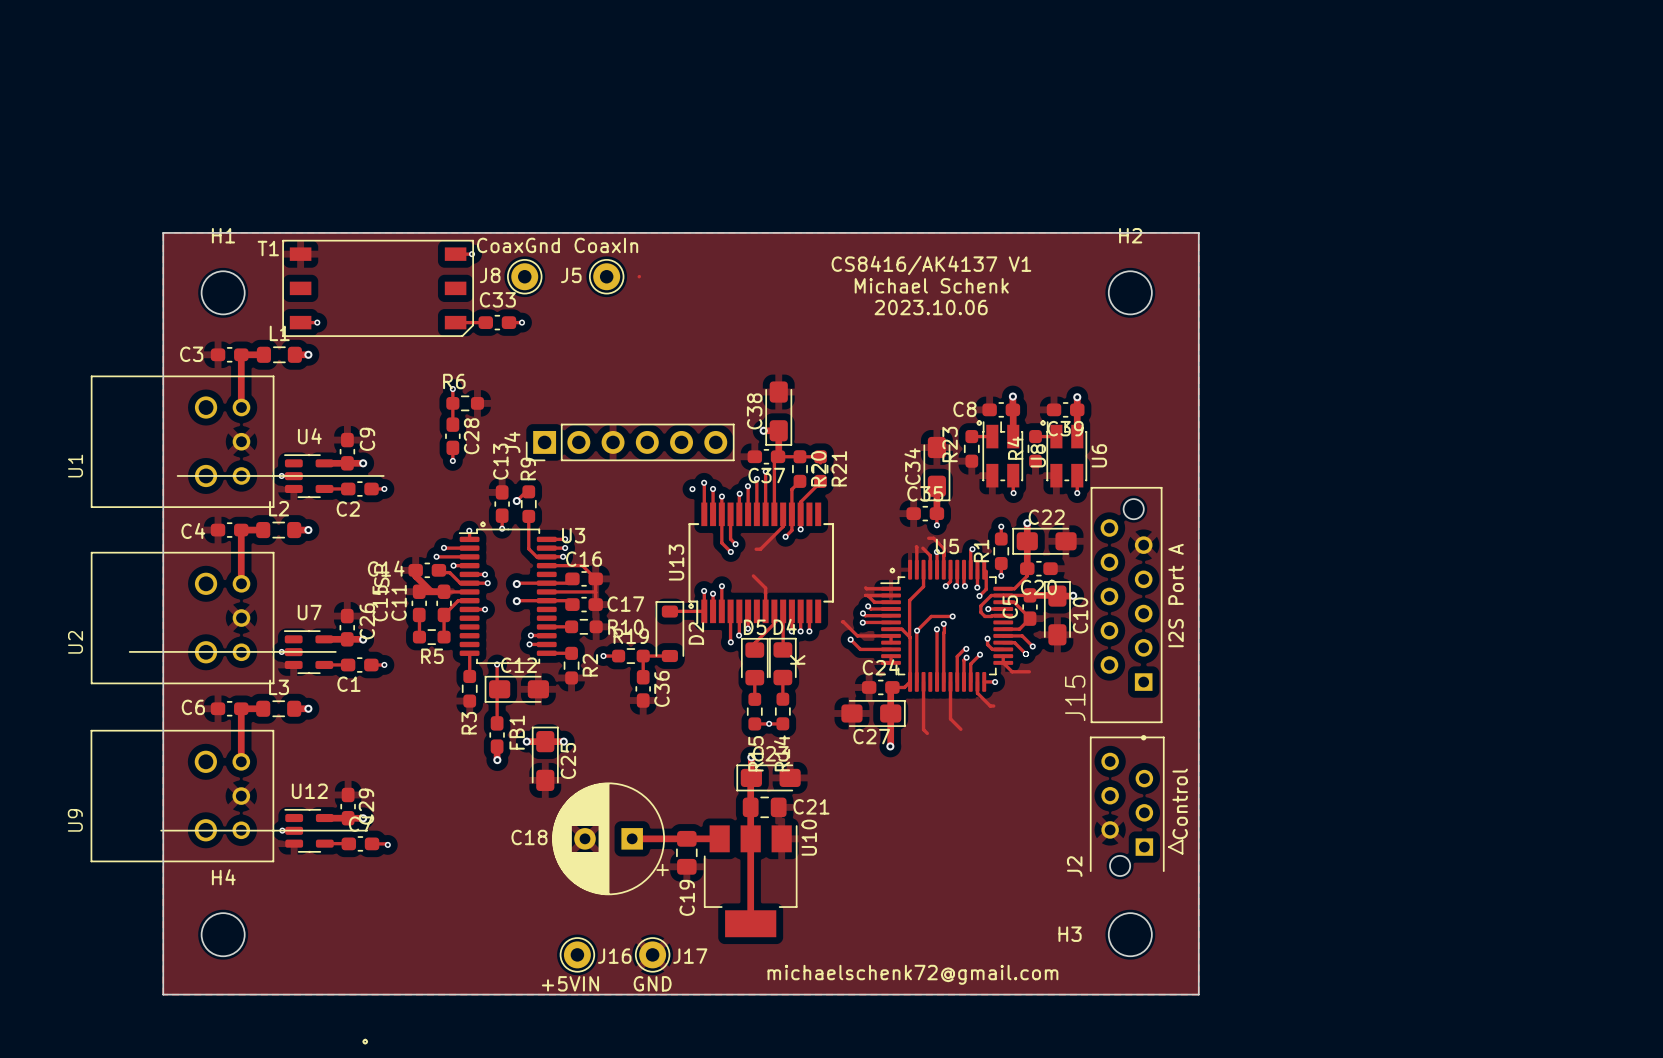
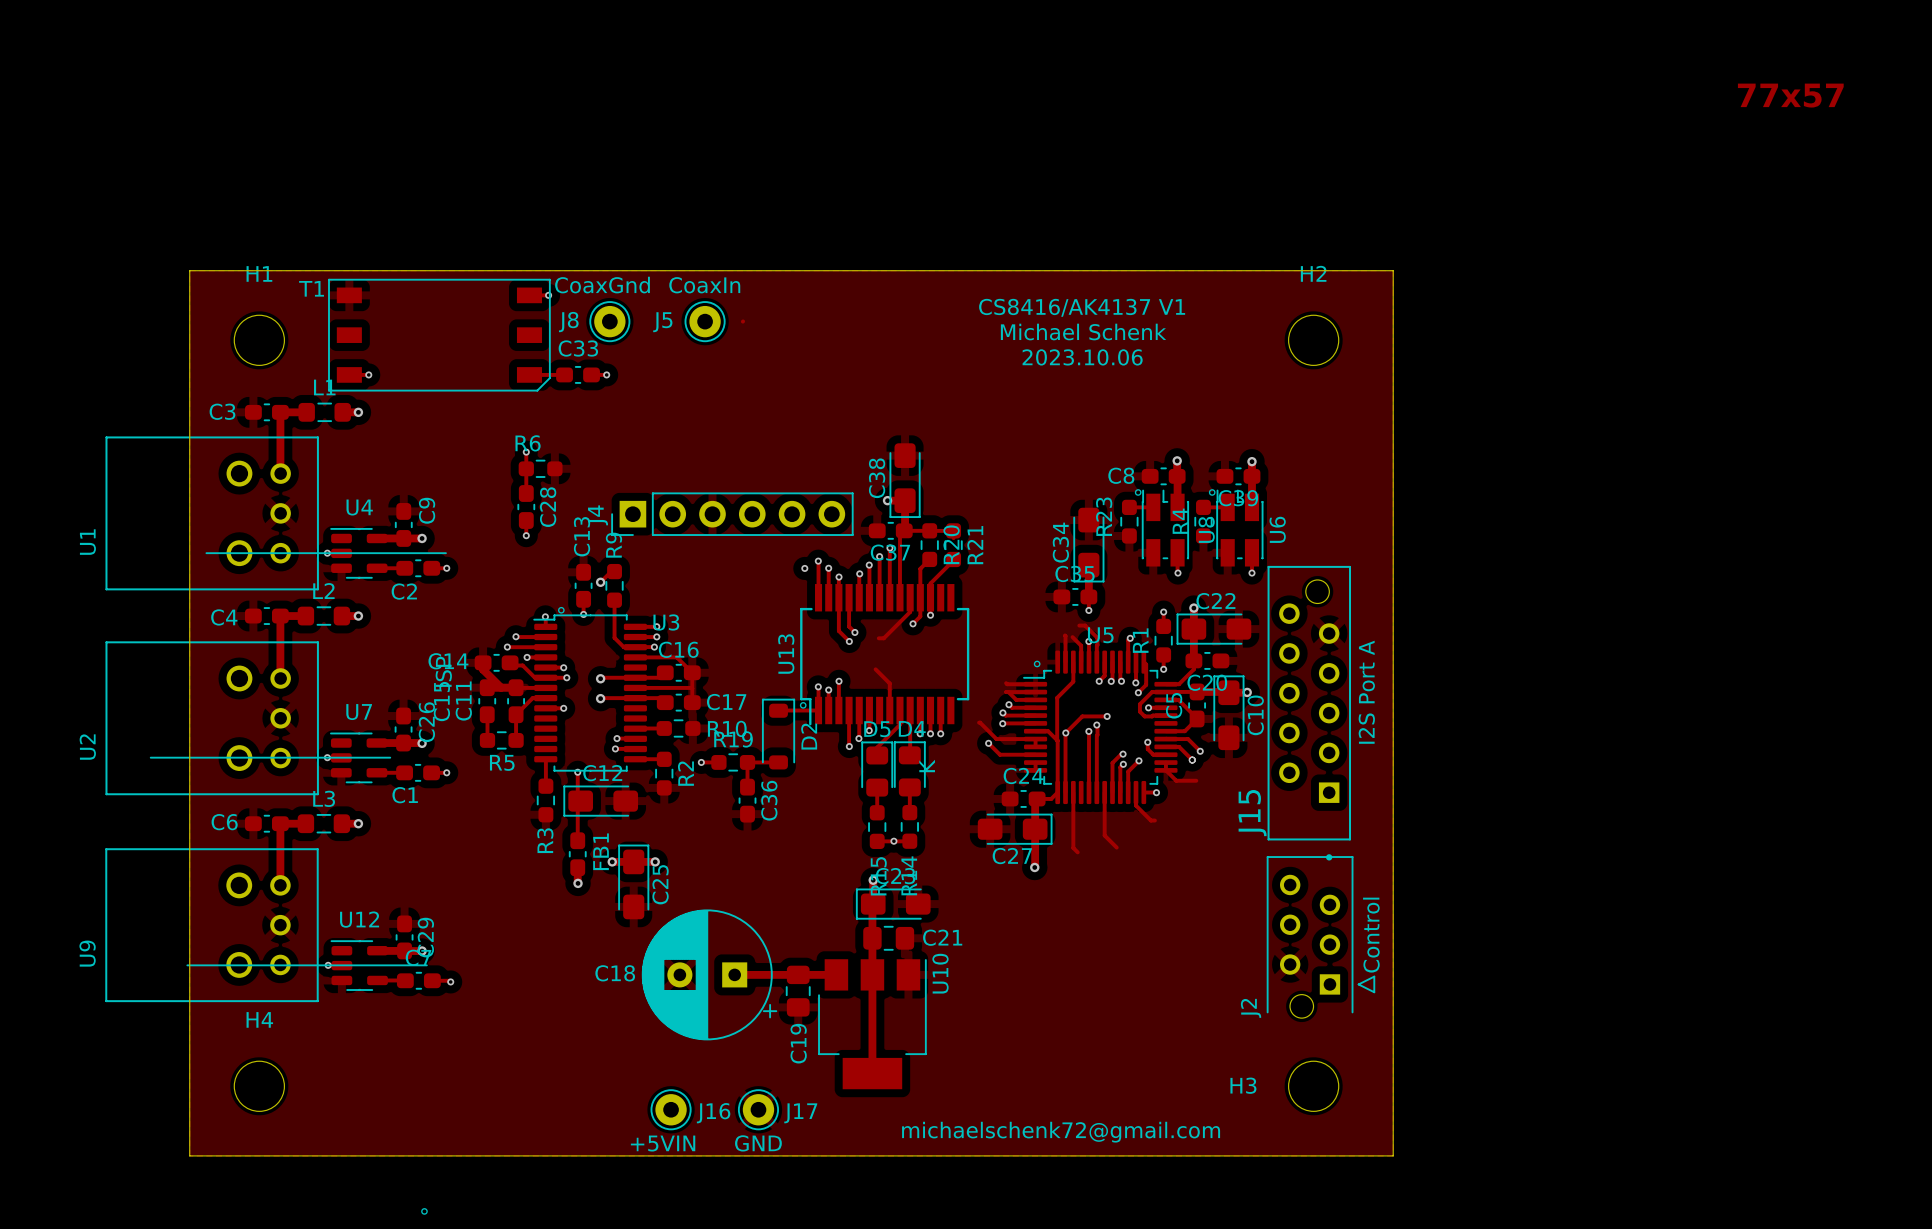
text: none -> 77x57 (1790, 95)

